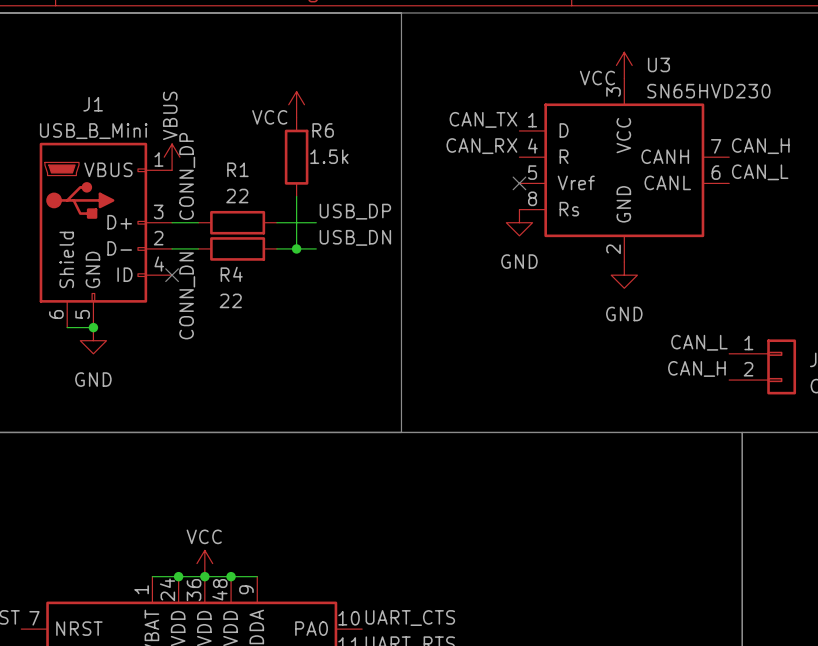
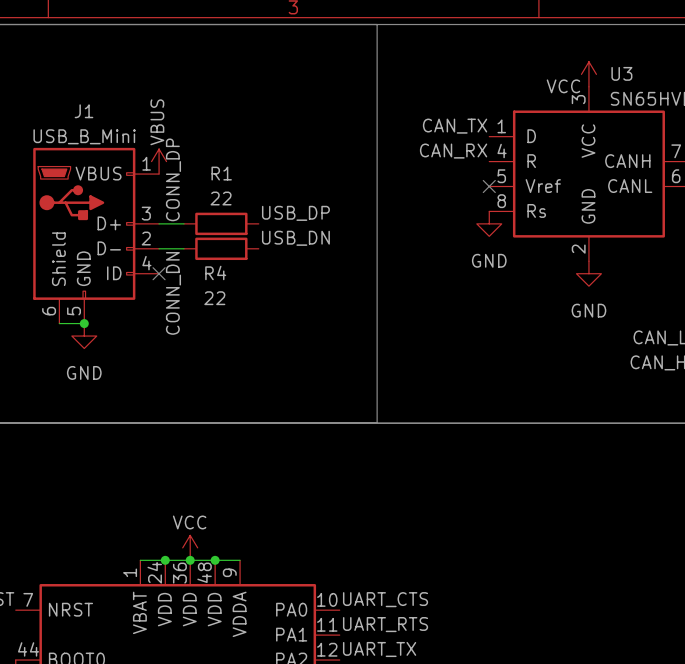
power symbol: VCC (296, 104) -> none
R6: 1.5k (296, 157) -> none
wire: (296, 196) (296, 248) -> none
label position: USB_DP (355, 211) -> USB_DP (295, 213)
wire: (276, 222) (316, 222) -> none
label position: USB_DN (355, 237) -> USB_DN (295, 238)
wire: (276, 248) (316, 248) -> none
junction: (296, 248) -> none

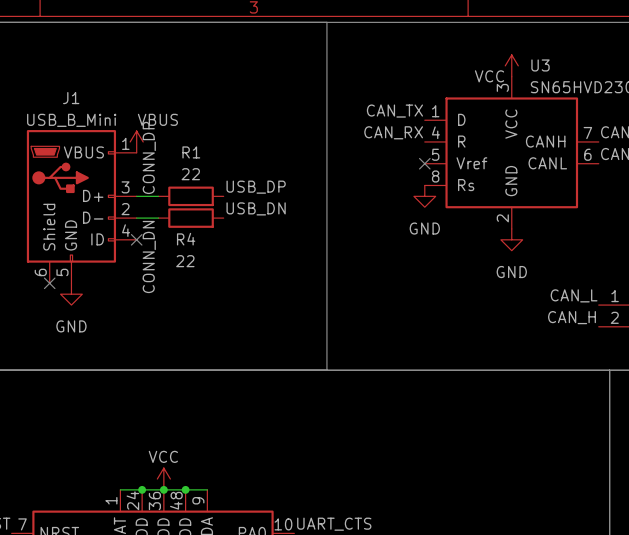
power symbol text rotation: 0° (157, 122) -> 90° clockwise (157, 119)
wire: (59, 323) (84, 323) -> none
no-connect mark: none -> (49, 283)
junction: (84, 323) -> none

